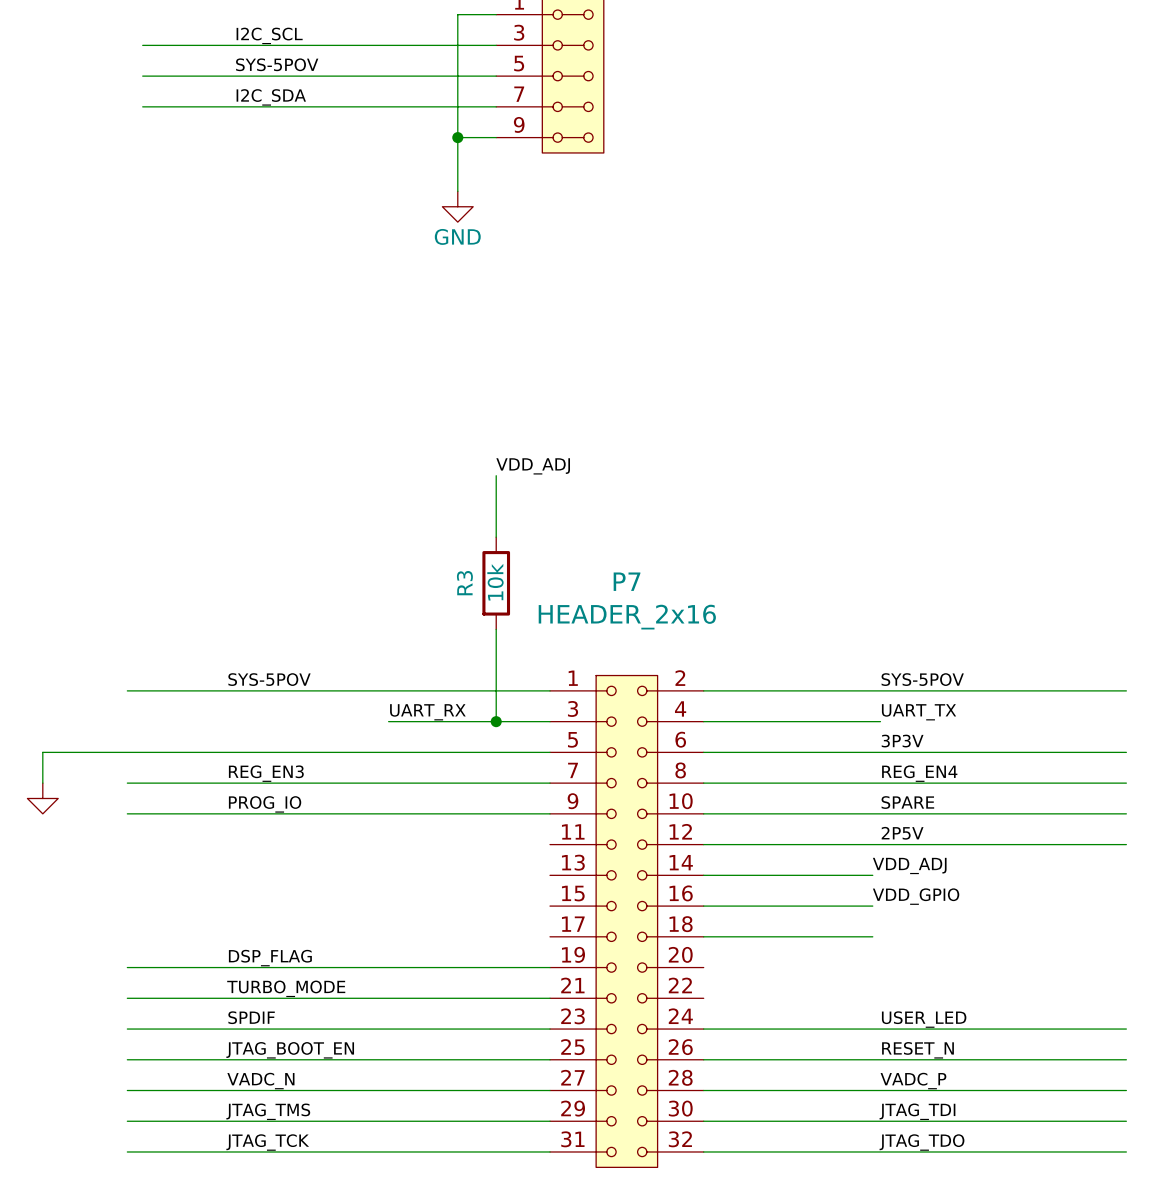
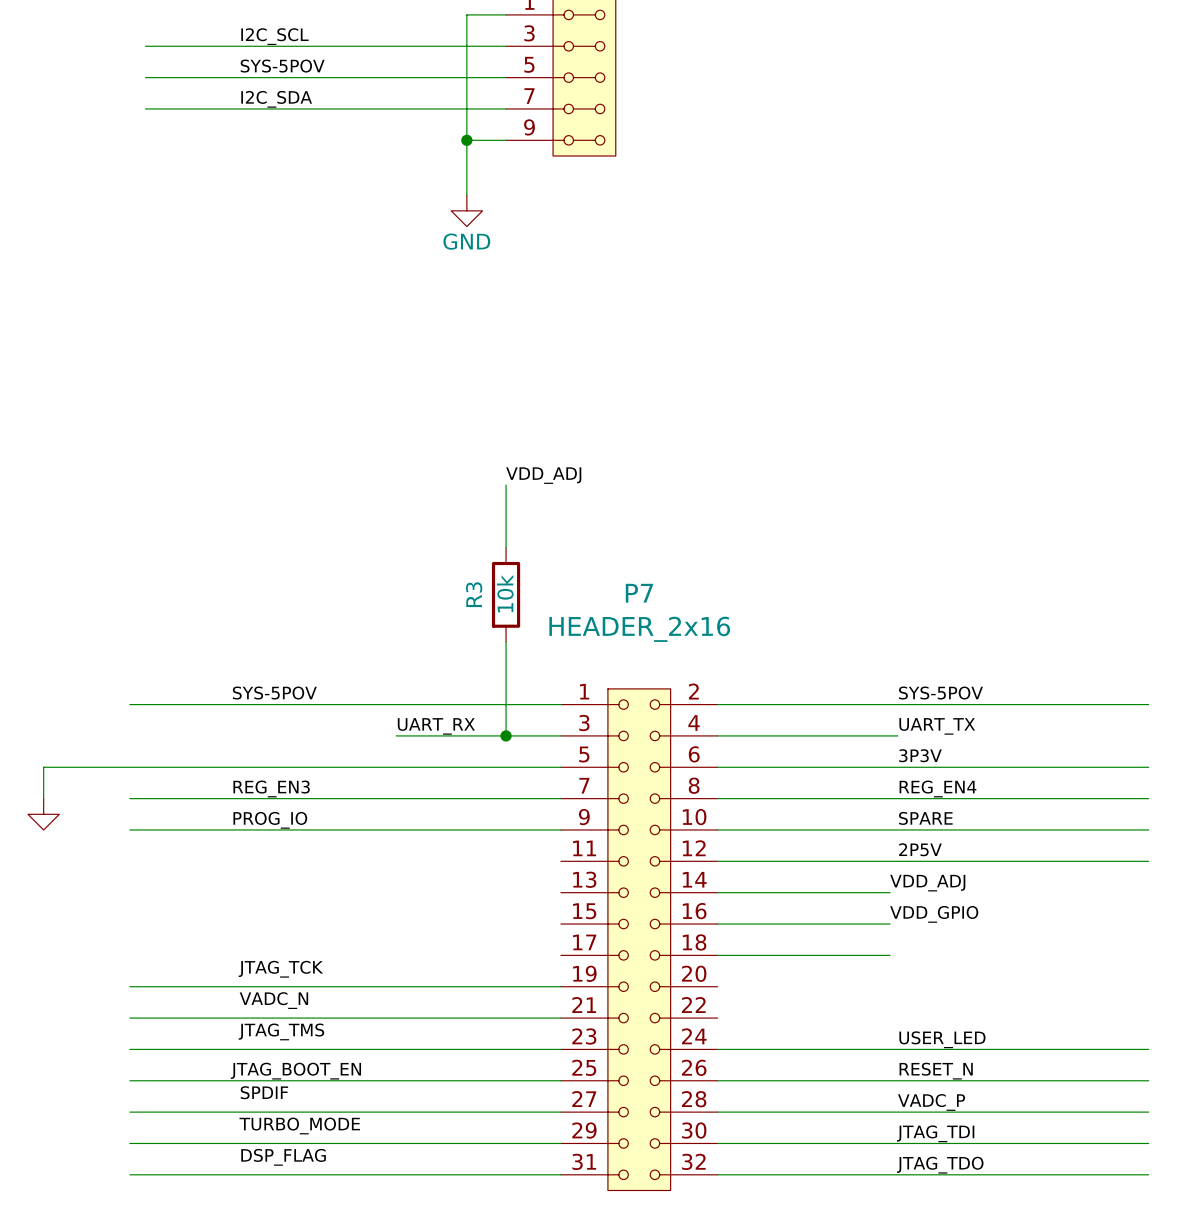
label position: DSP_FLAG (270, 958) -> DSP_FLAG (283, 1157)
label position: TURBO_MODE (286, 988) -> TURBO_MODE (299, 1125)
label position: SPDIF (251, 1017) -> SPDIF (264, 1092)
label position: VADC_N (260, 1081) -> VADC_N (273, 1000)
label position: JTAG_TMS (268, 1111) -> JTAG_TMS (281, 1031)
label position: JTAG_TCK (267, 1142) -> JTAG_TCK (280, 969)

